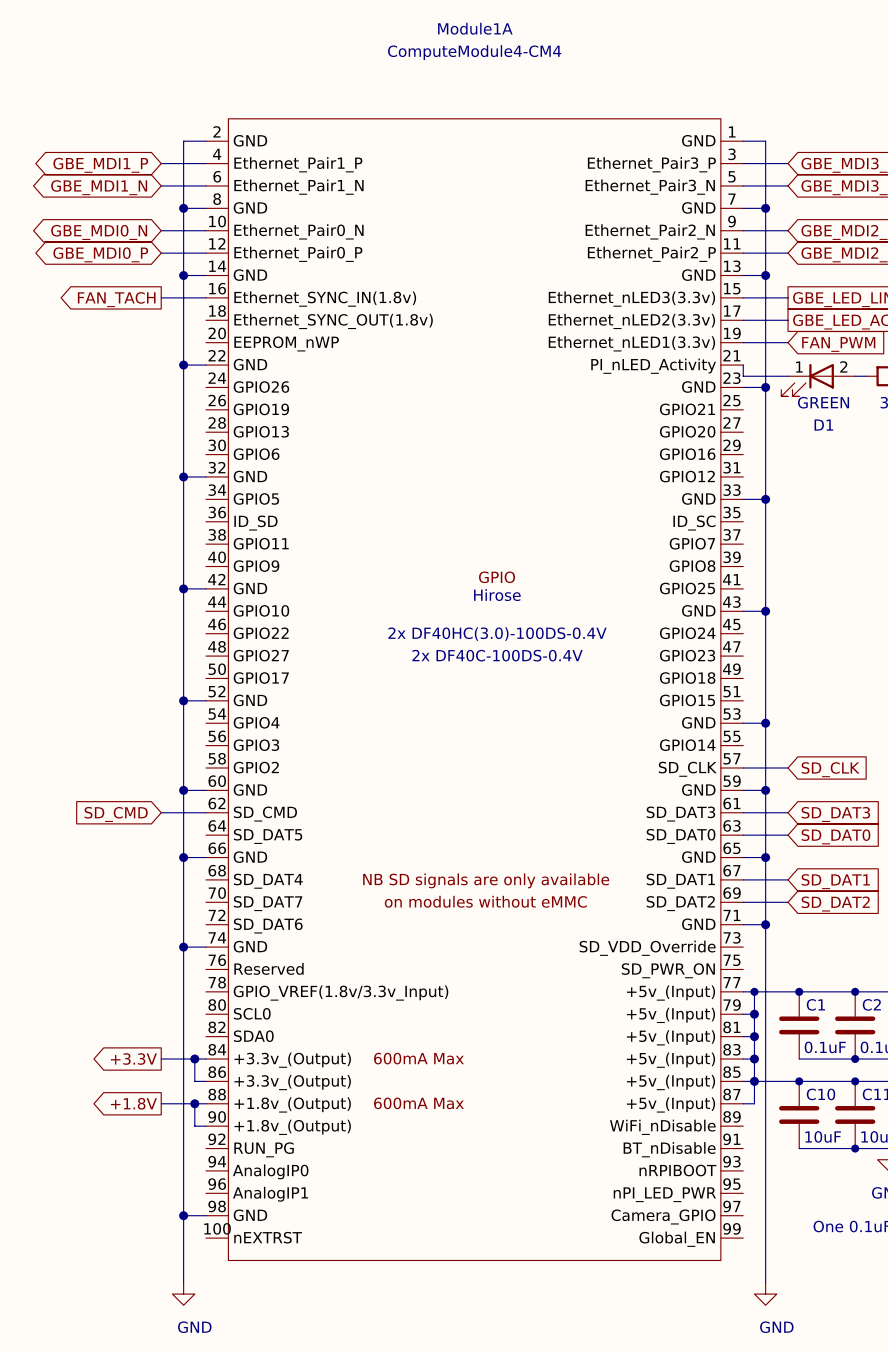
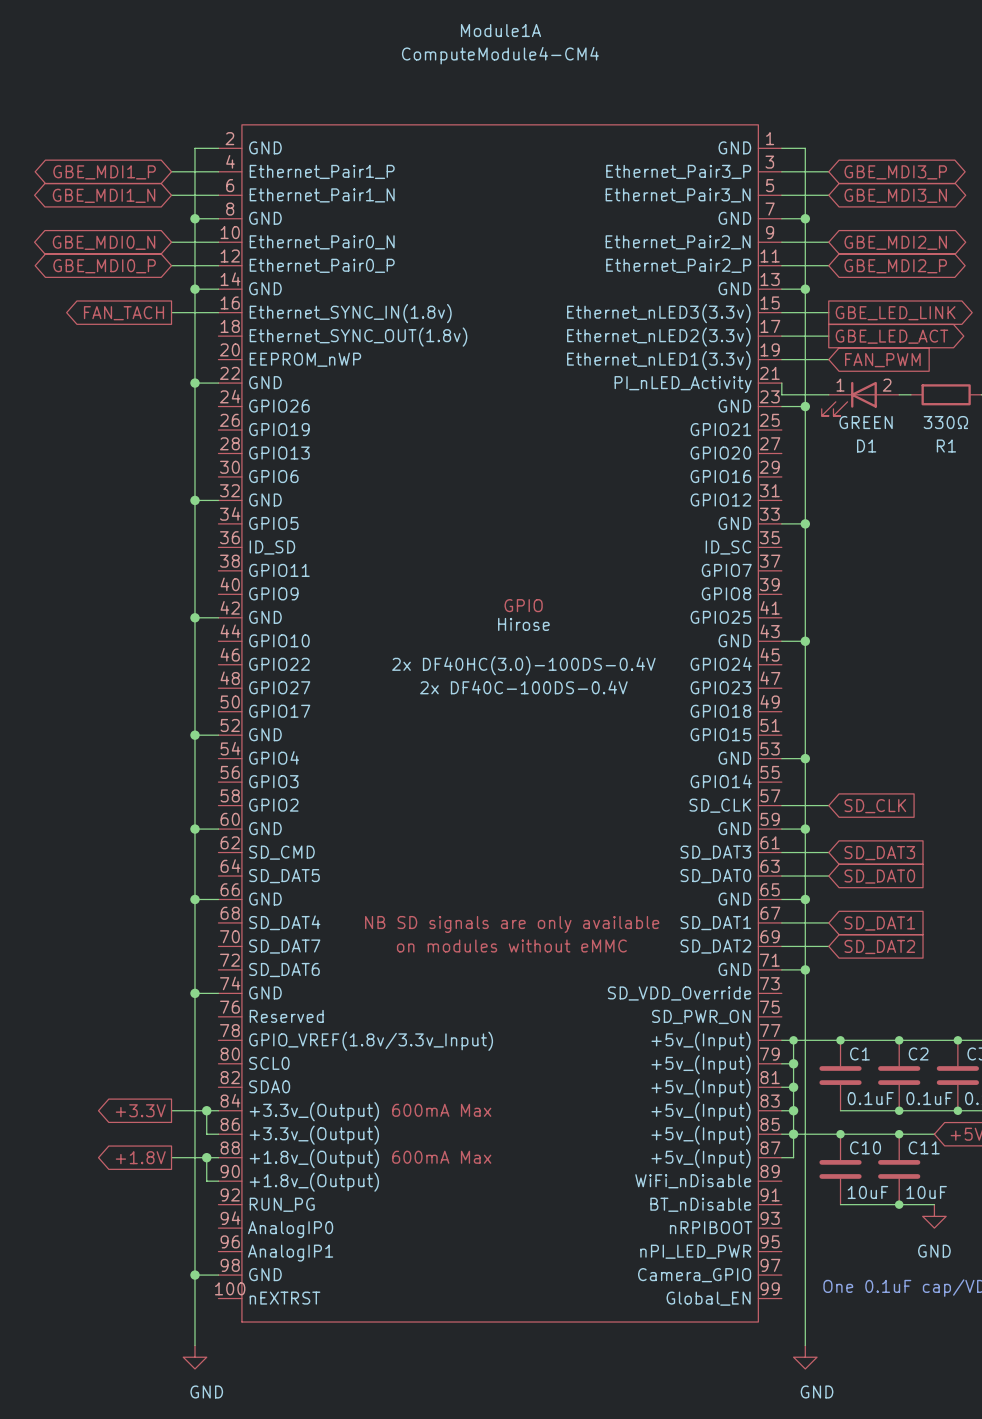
wire: (161, 812) (206, 812) -> none
global label: SD_CMD (116, 814) -> none

